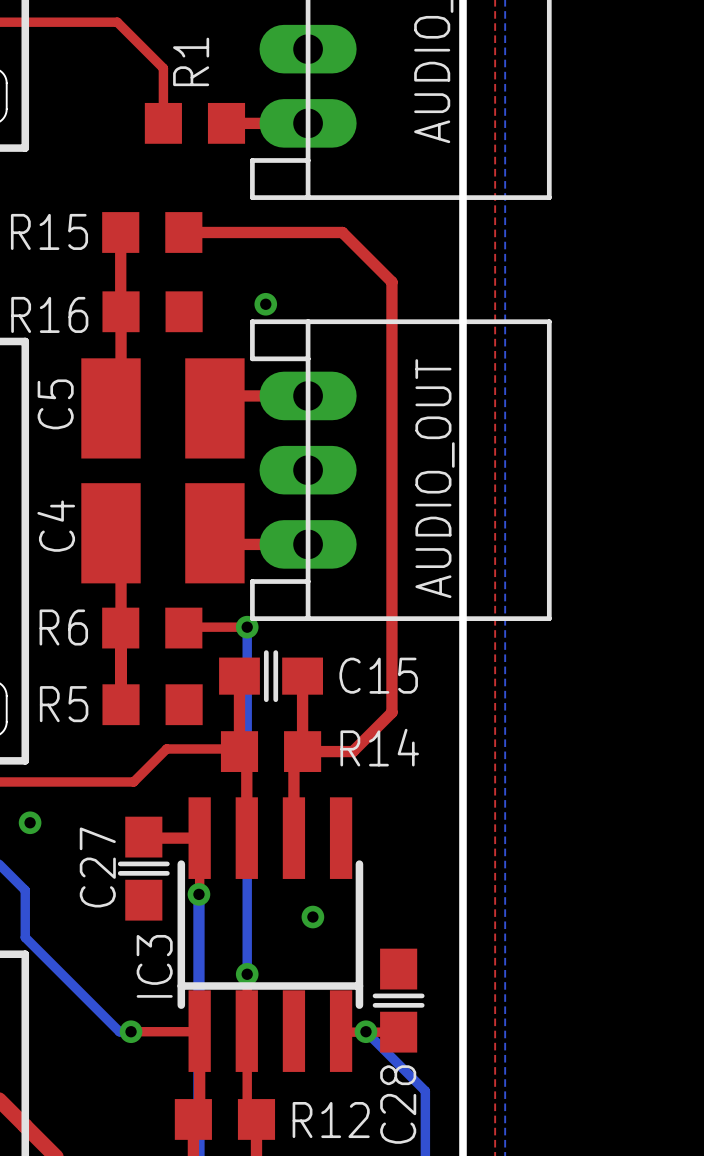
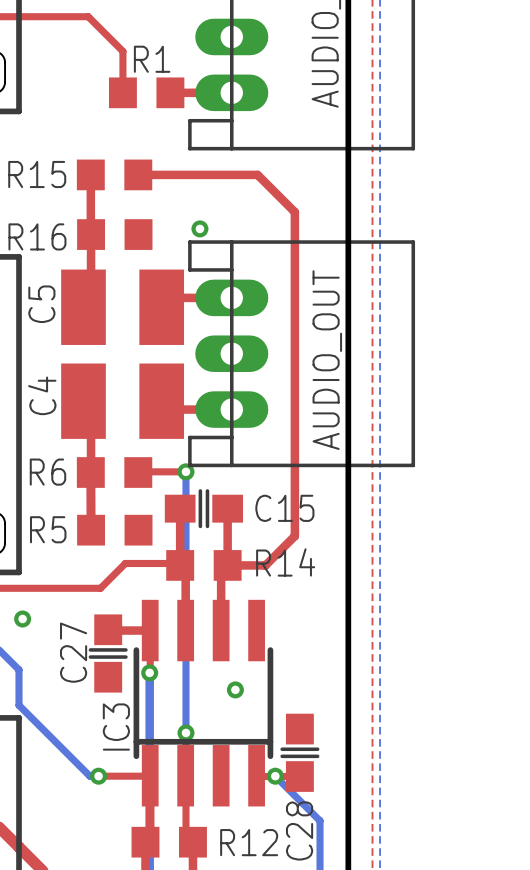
R1 name rotation: 0° (191, 61) -> 90° clockwise (152, 59)

